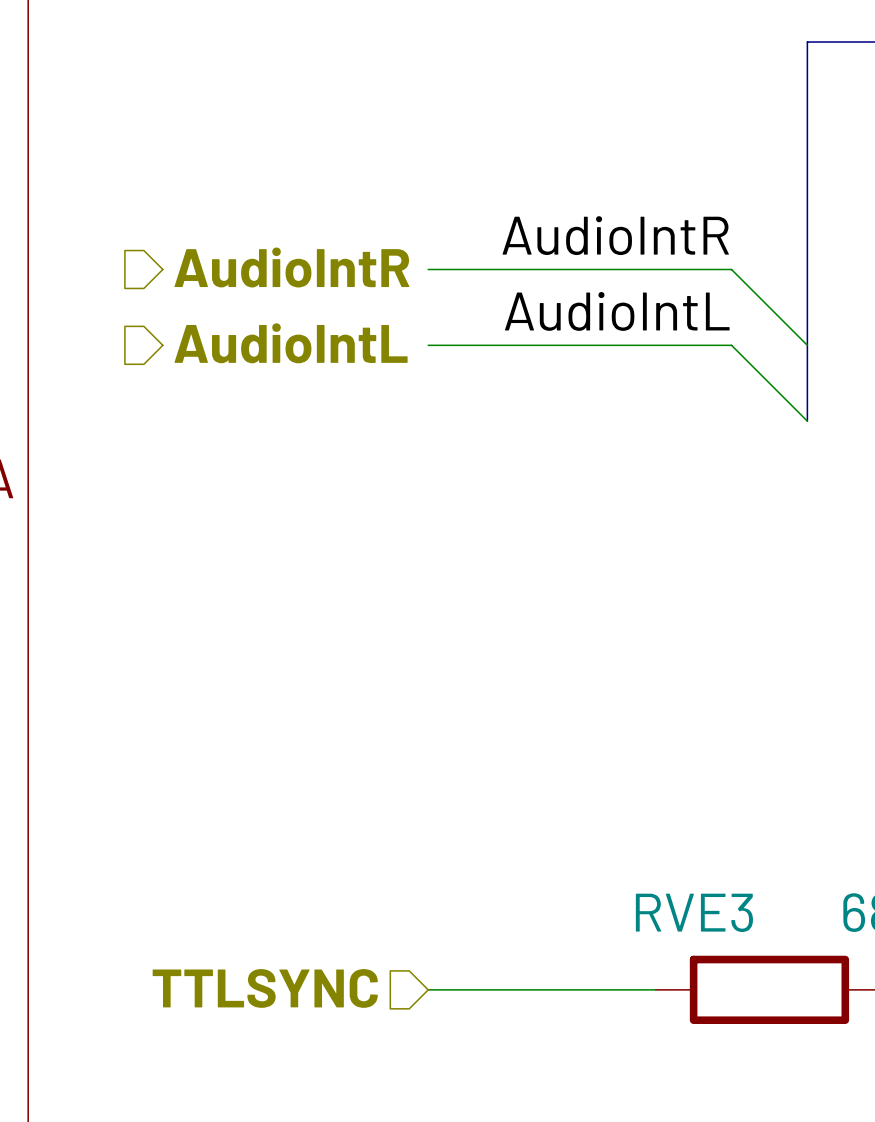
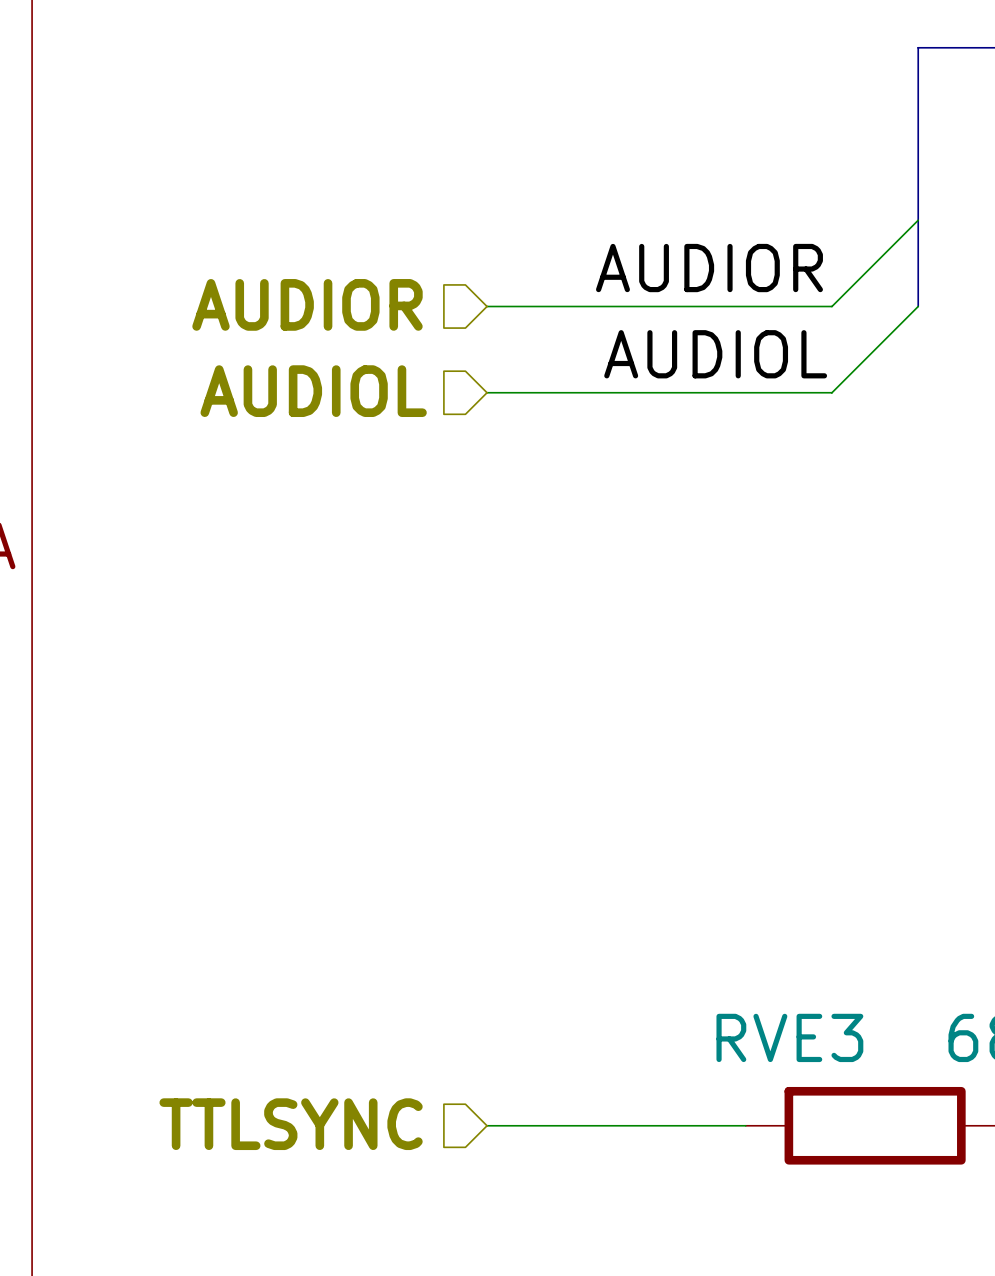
label: AudioIntR (615, 235) -> AUDIOR (709, 268)
hierarchical label: AudioIntR (291, 267) -> none
hierarchical label: none -> AUDIOR (307, 304)
wire: (731, 269) (807, 345) -> (831, 306) (918, 220)
bus: (807, 269) (807, 421) -> none
label: AudioIntL (617, 311) -> AUDIOL (715, 354)
hierarchical label: none -> AUDIOL (313, 391)
hierarchical label: AudioIntL (291, 343) -> none
wire: (731, 345) (807, 421) -> (831, 392) (918, 306)

